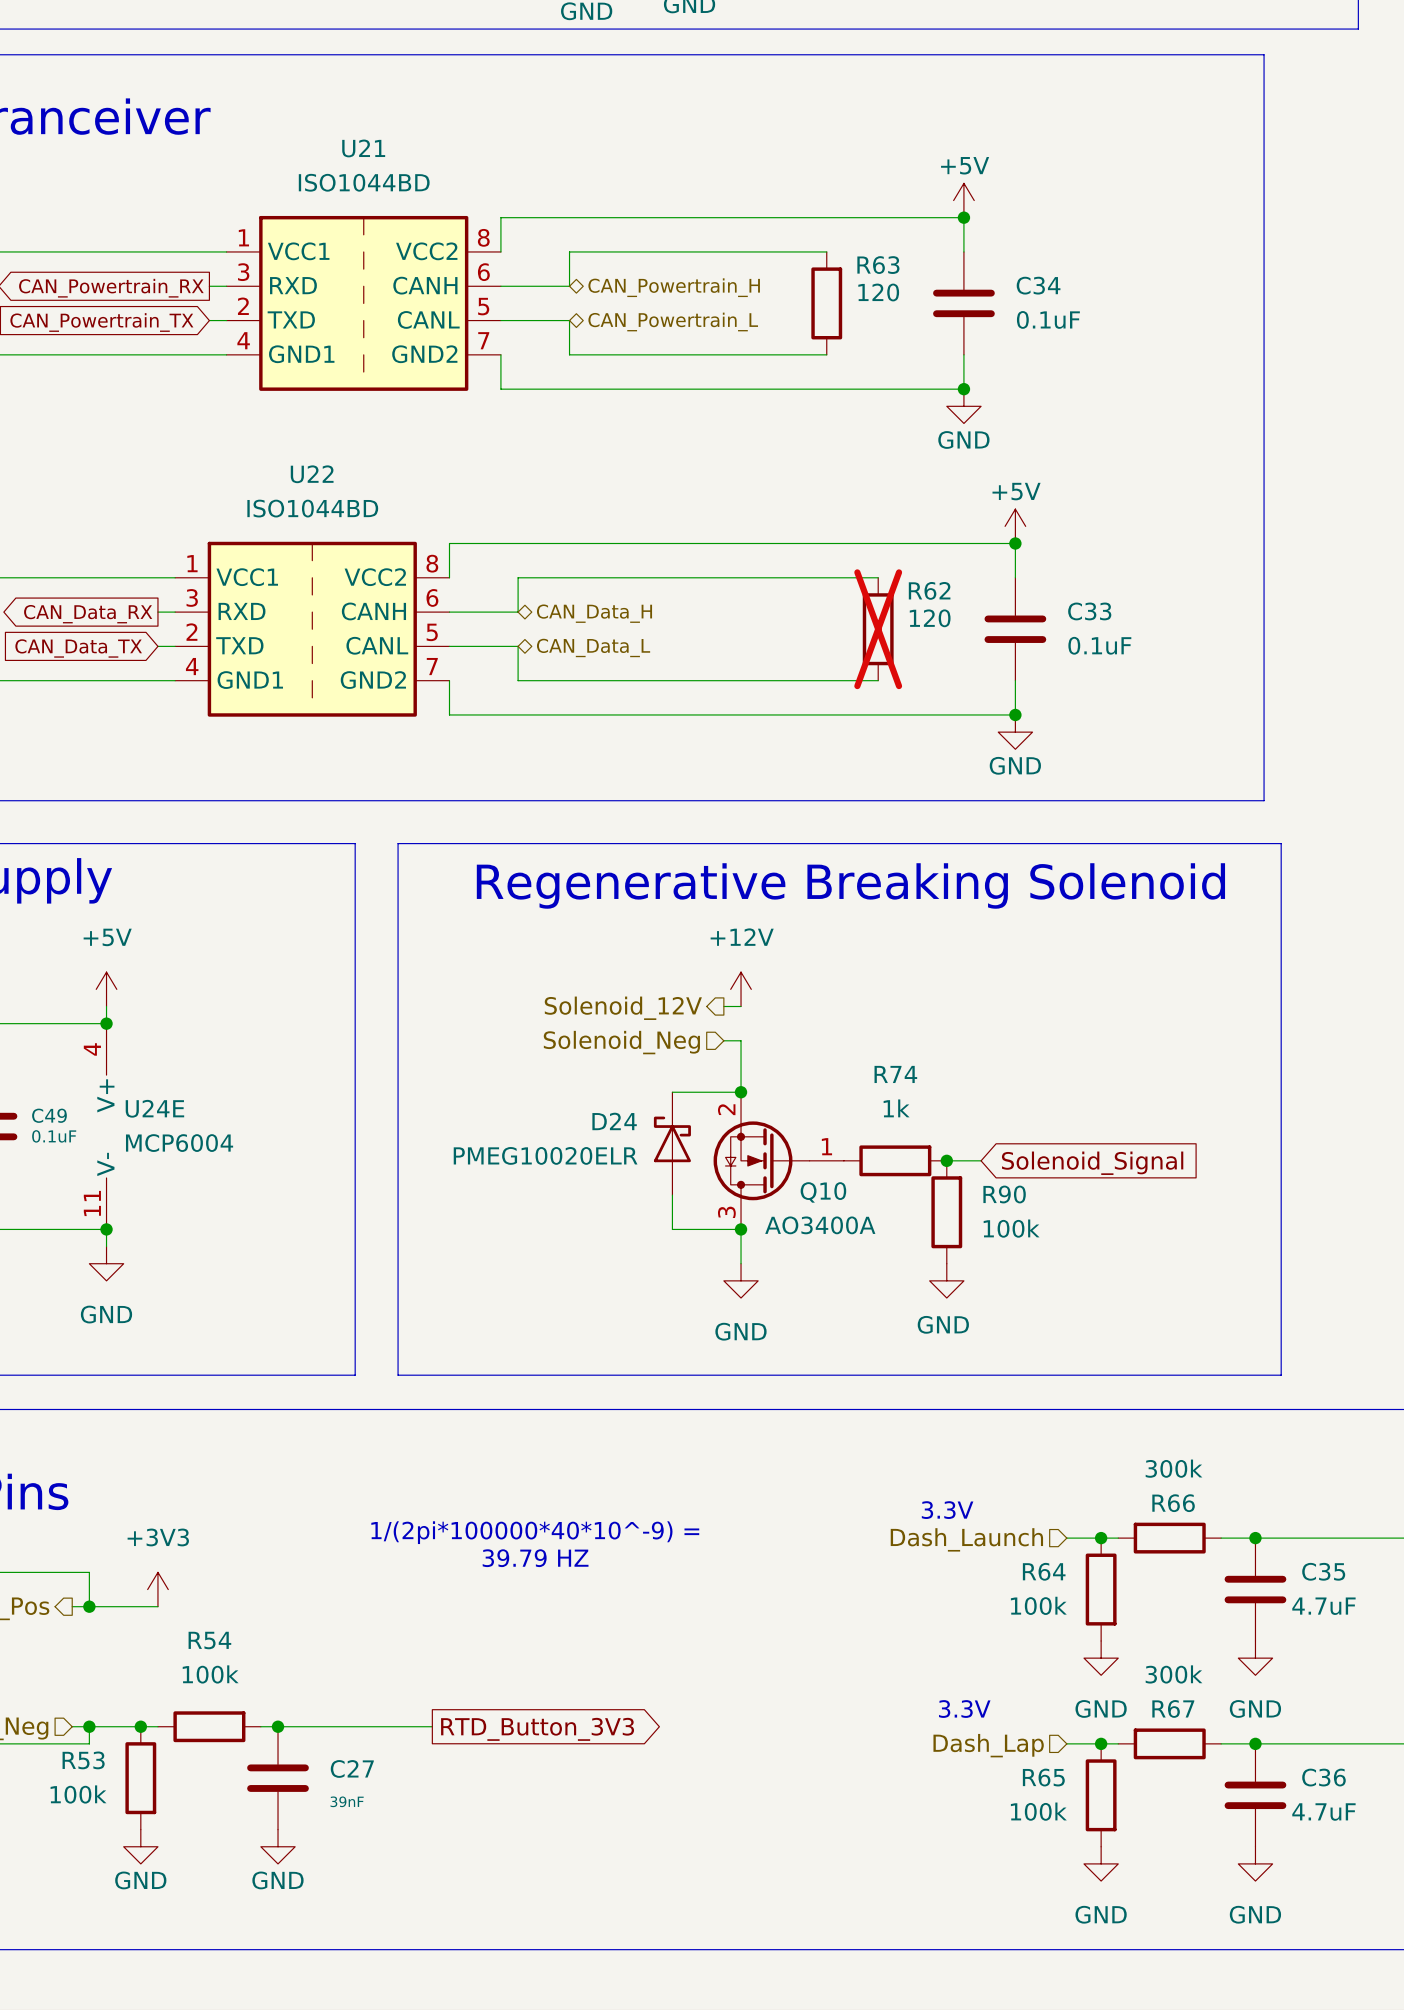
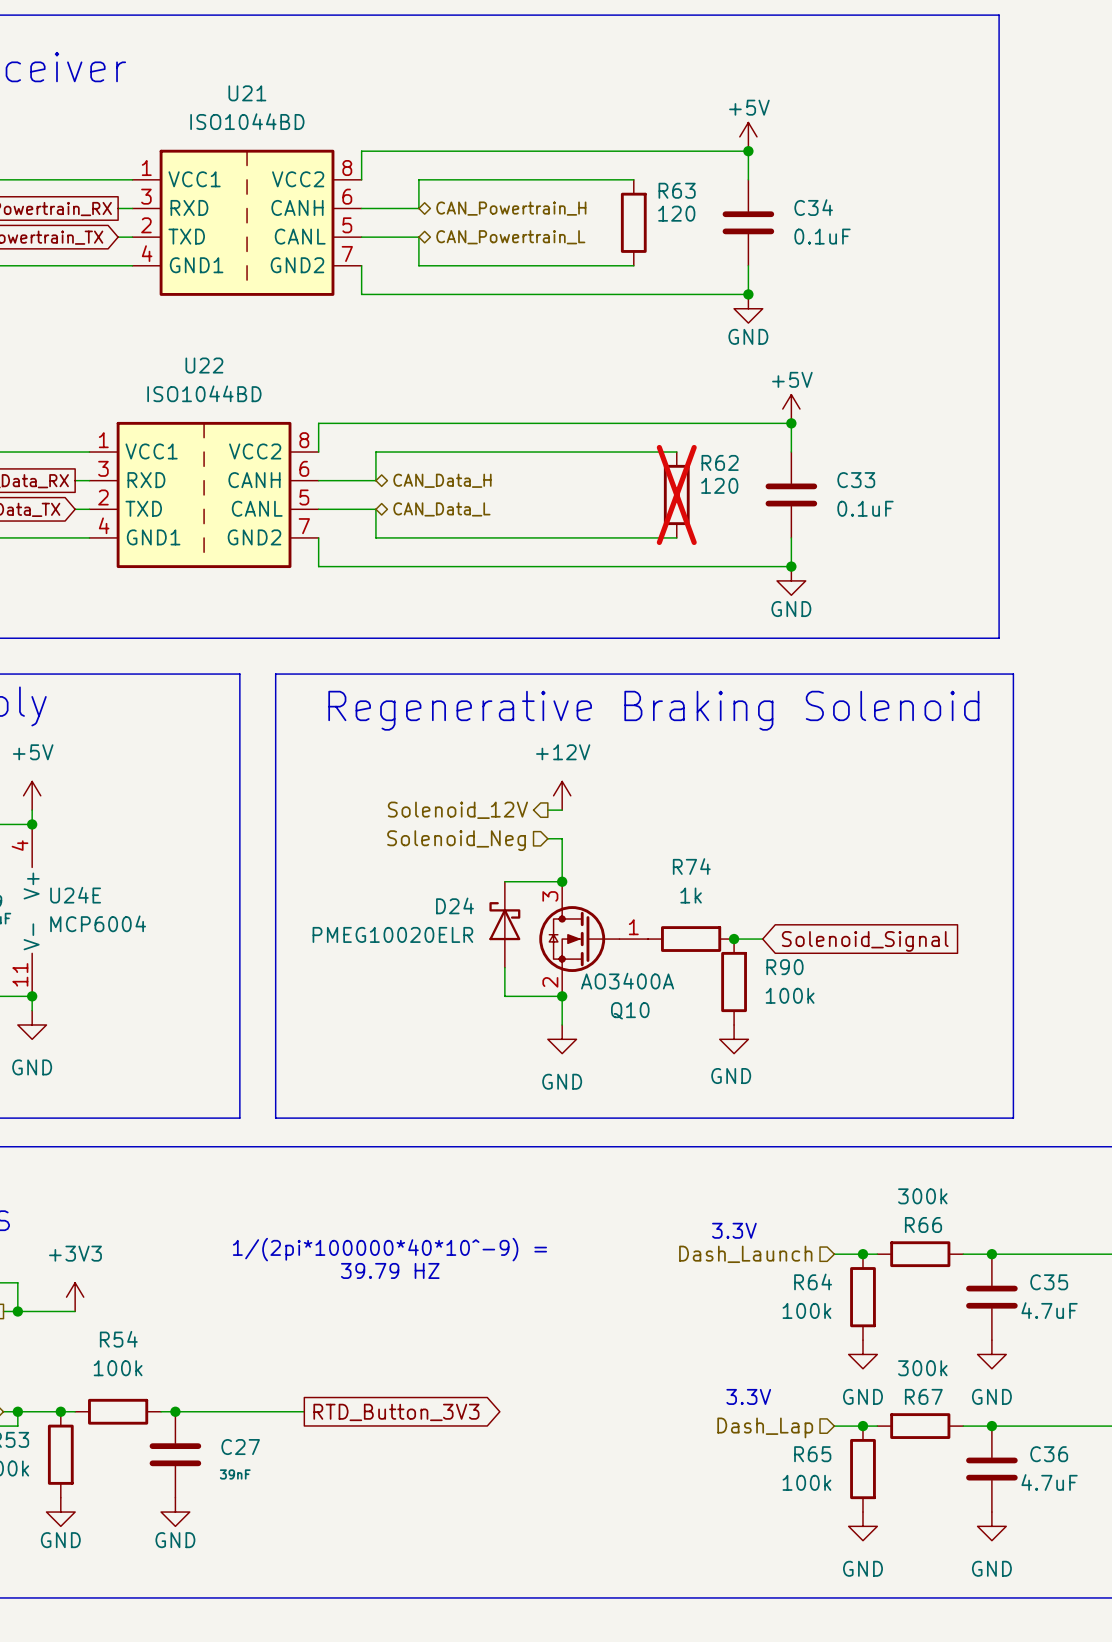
text: Regenerative Breaking Solenoid (850, 885) -> Regenerative Braking Solenoid (653, 710)
Q10 flip: as is (761, 1160) -> up-down (579, 939)
Q10 name position: Q10 (823, 1192) -> Q10 (630, 1010)

